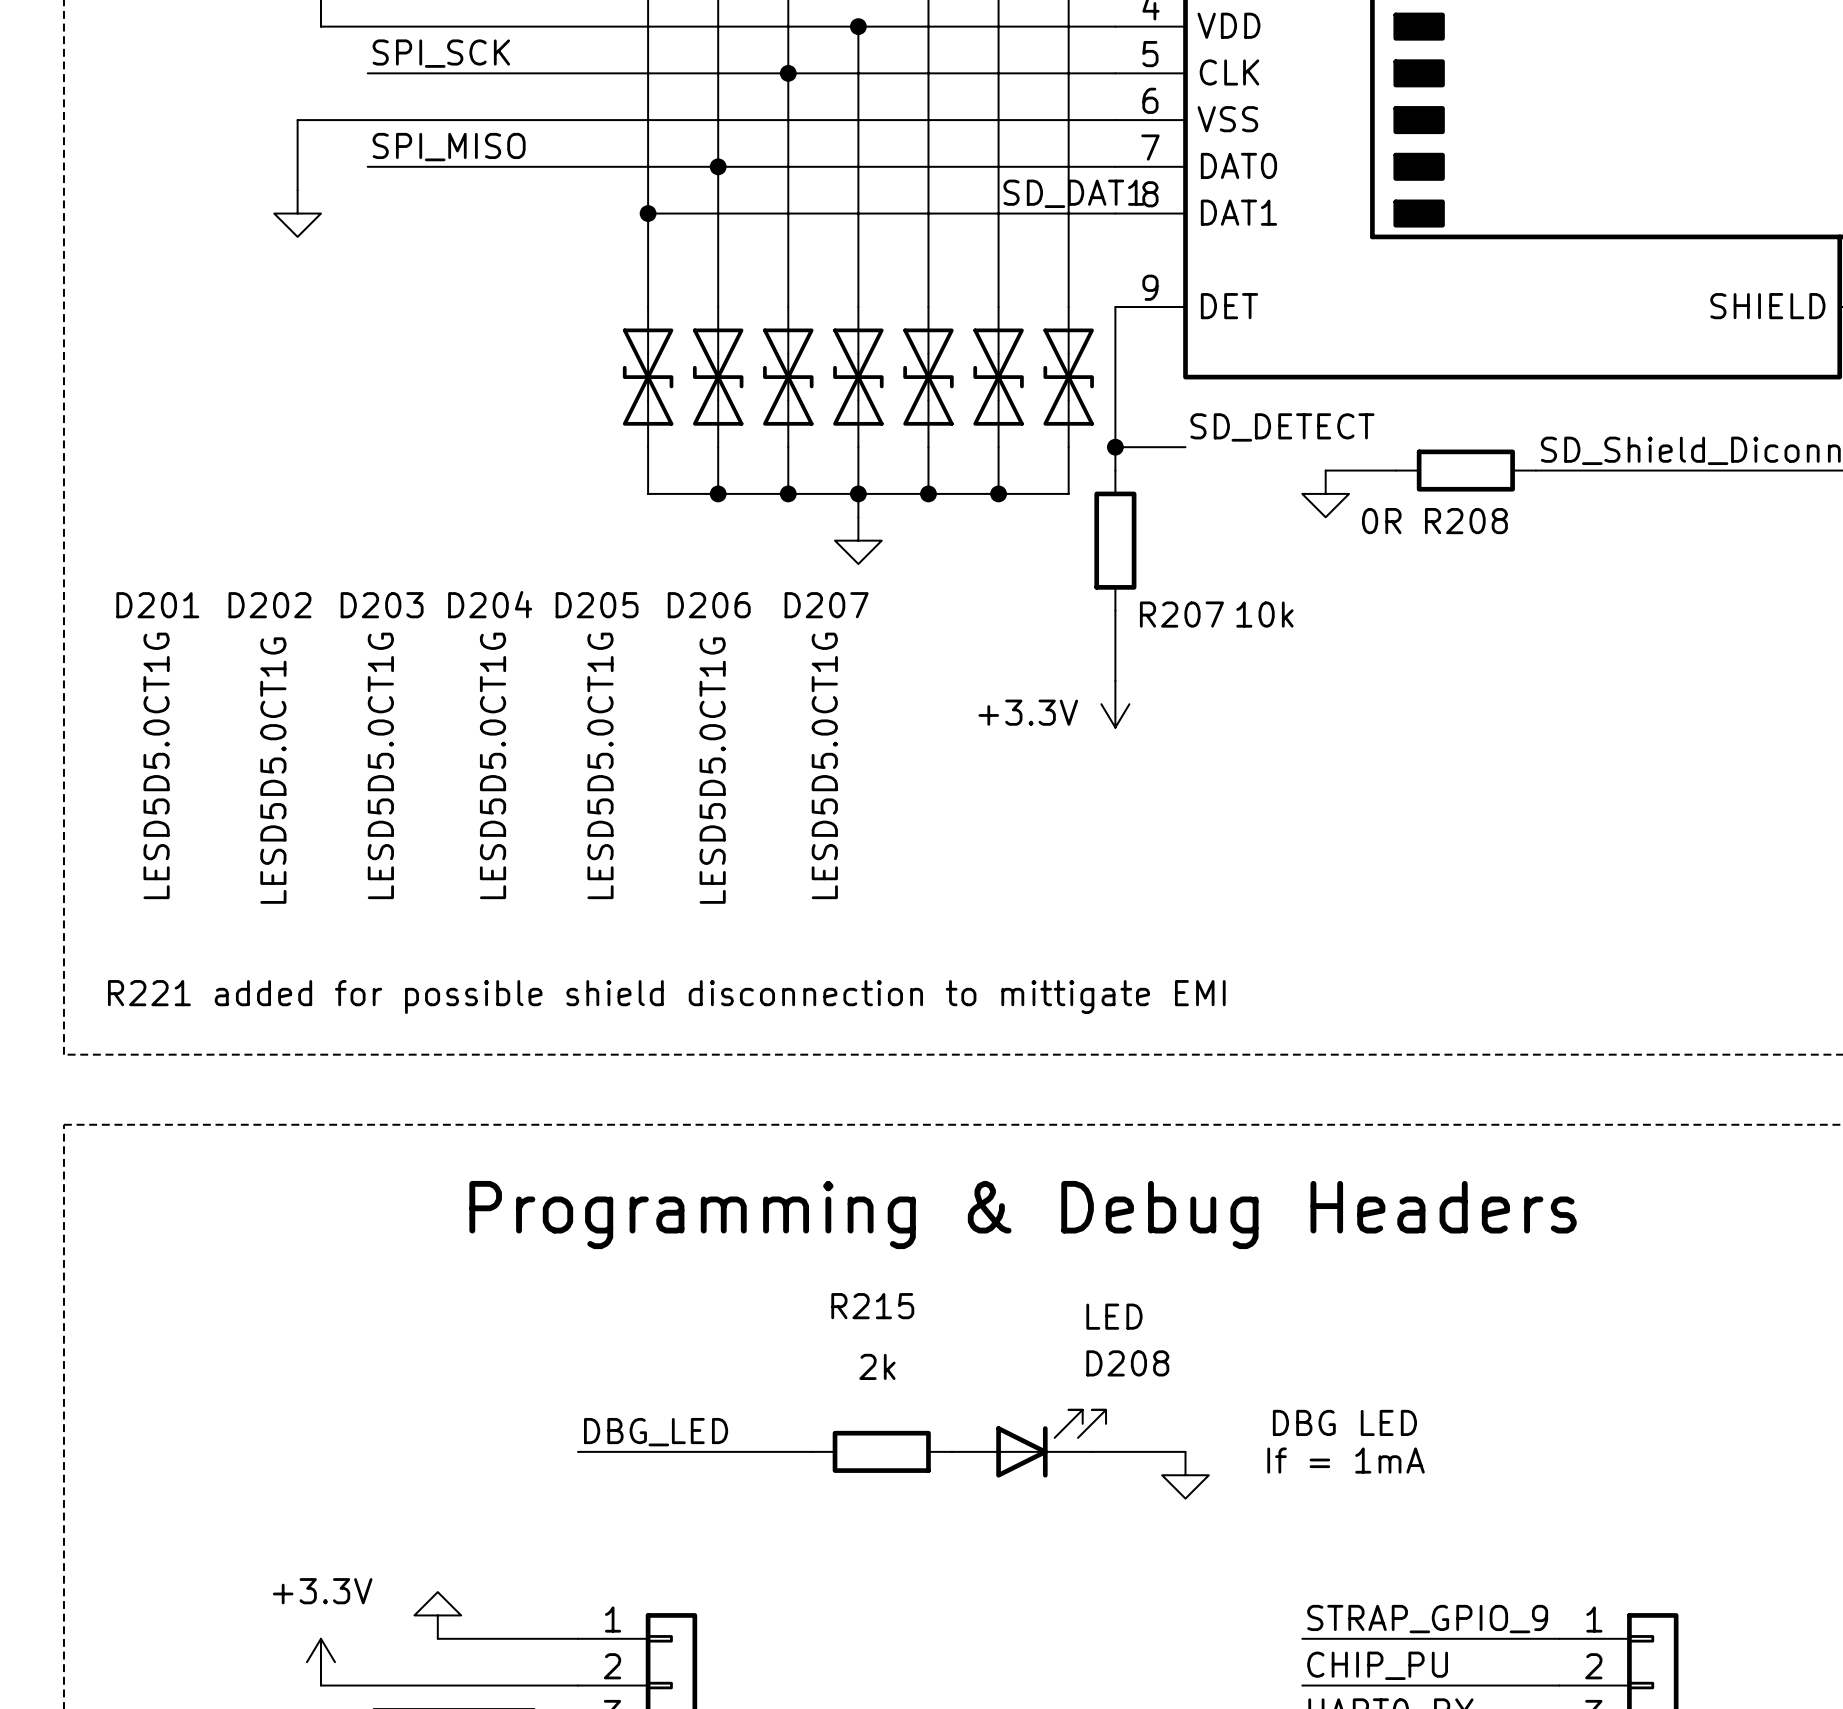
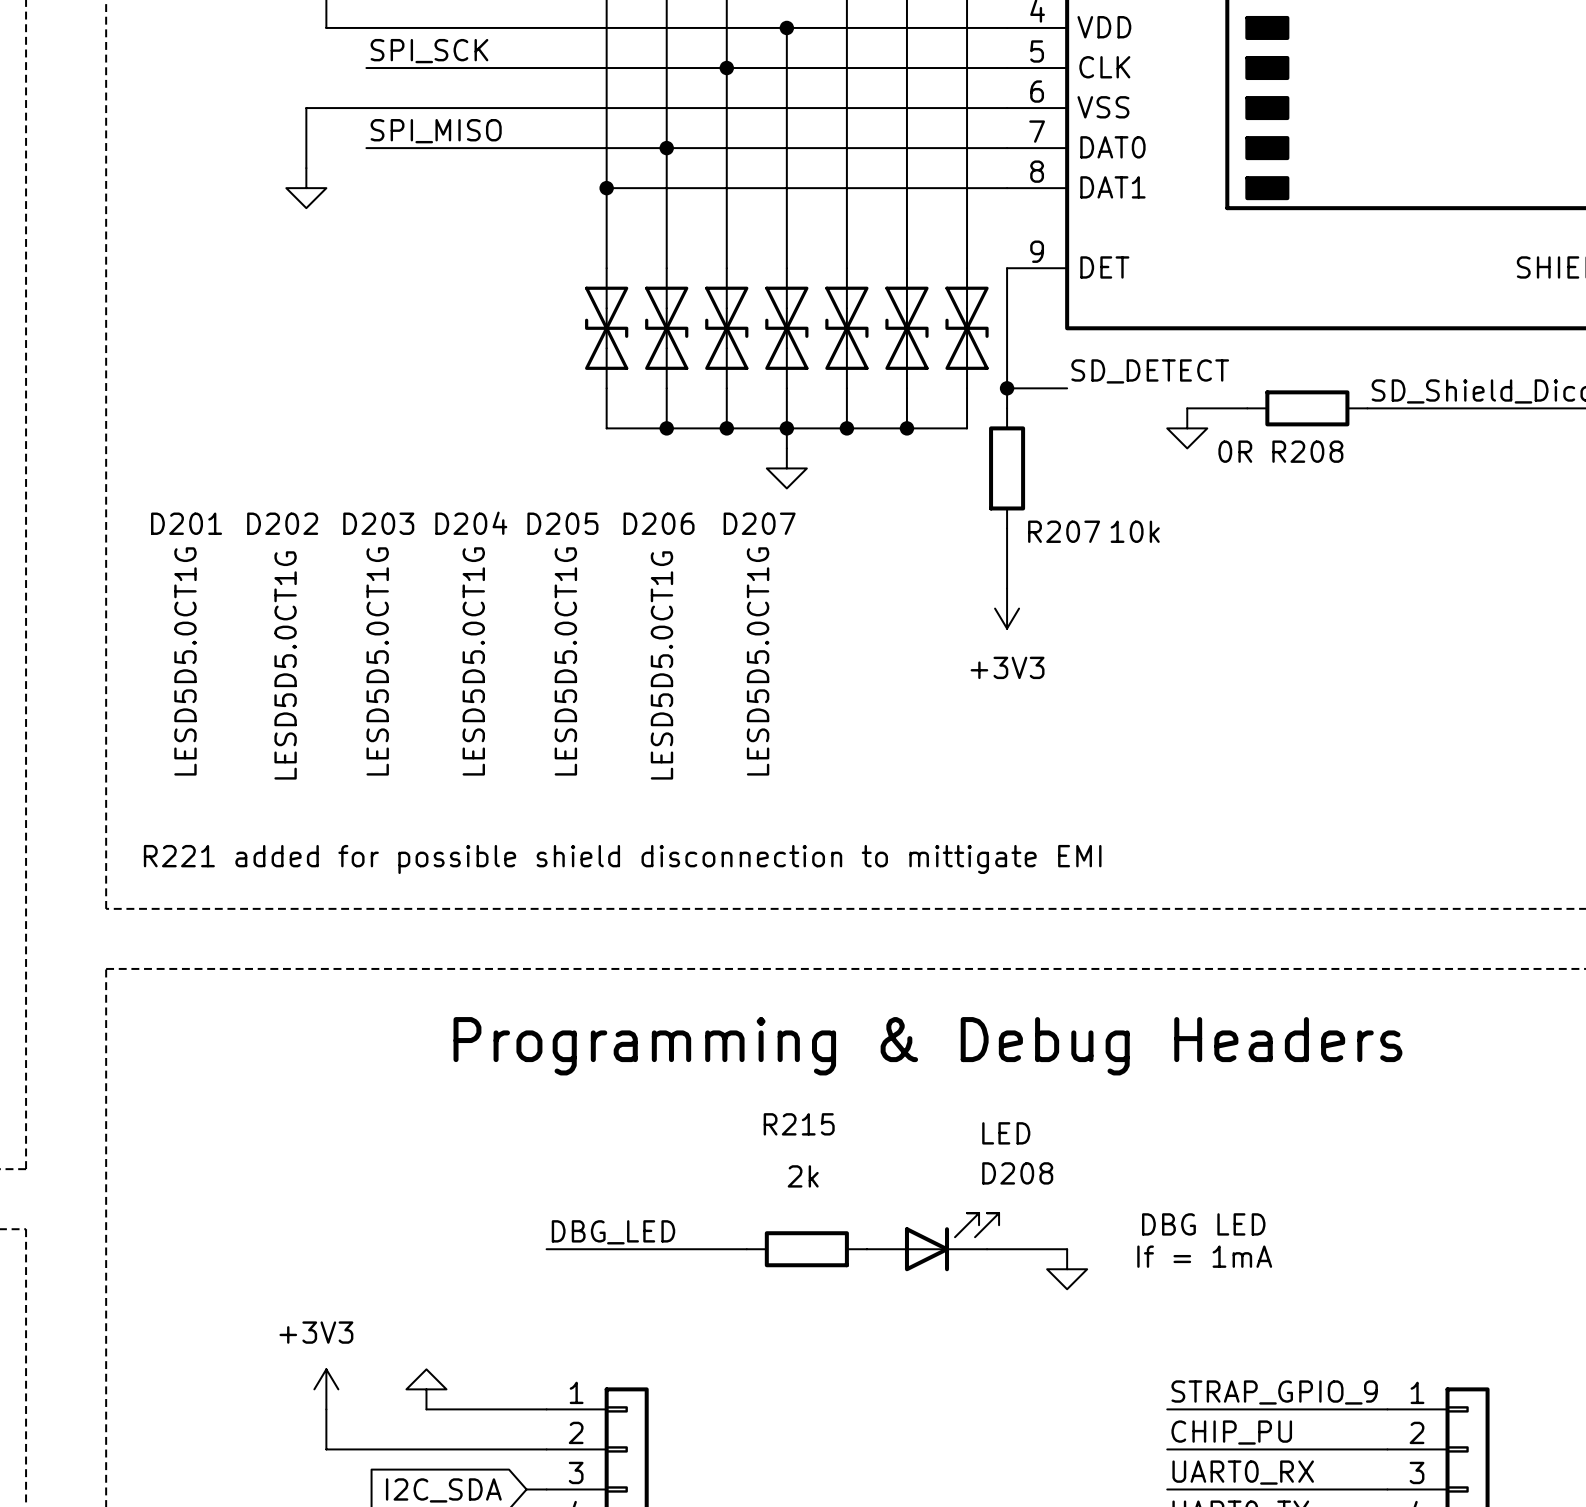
label: SD_DAT1 (1073, 193) -> none
power symbol: +3.3V (1115, 704) -> +3V3 (1007, 608)
power symbol: none -> +3V3 (326, 1389)
power symbol: +3.3V (320, 1662) -> none

